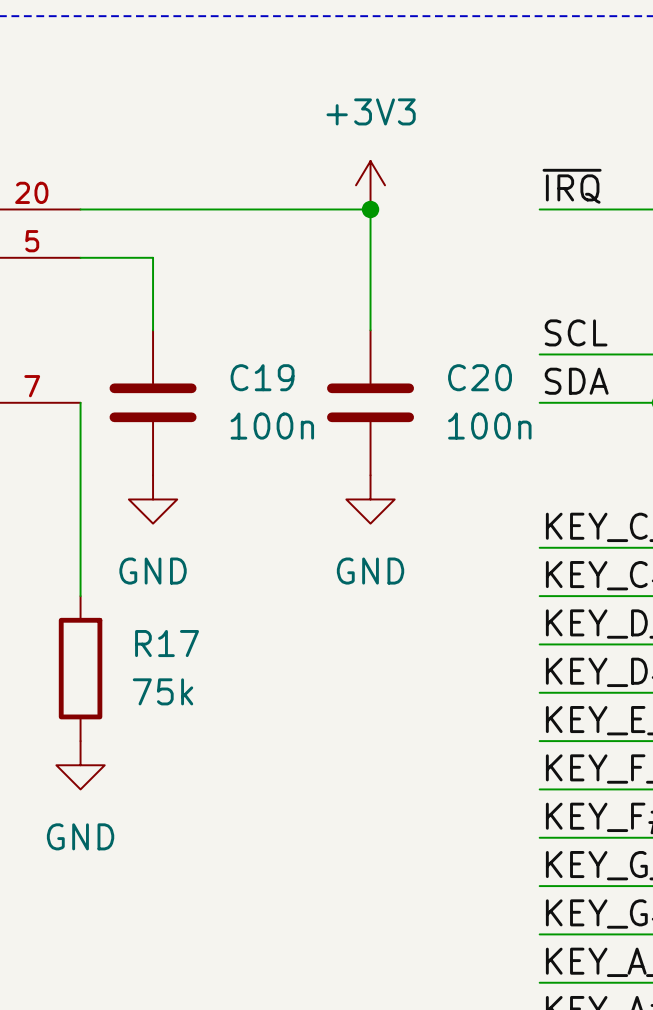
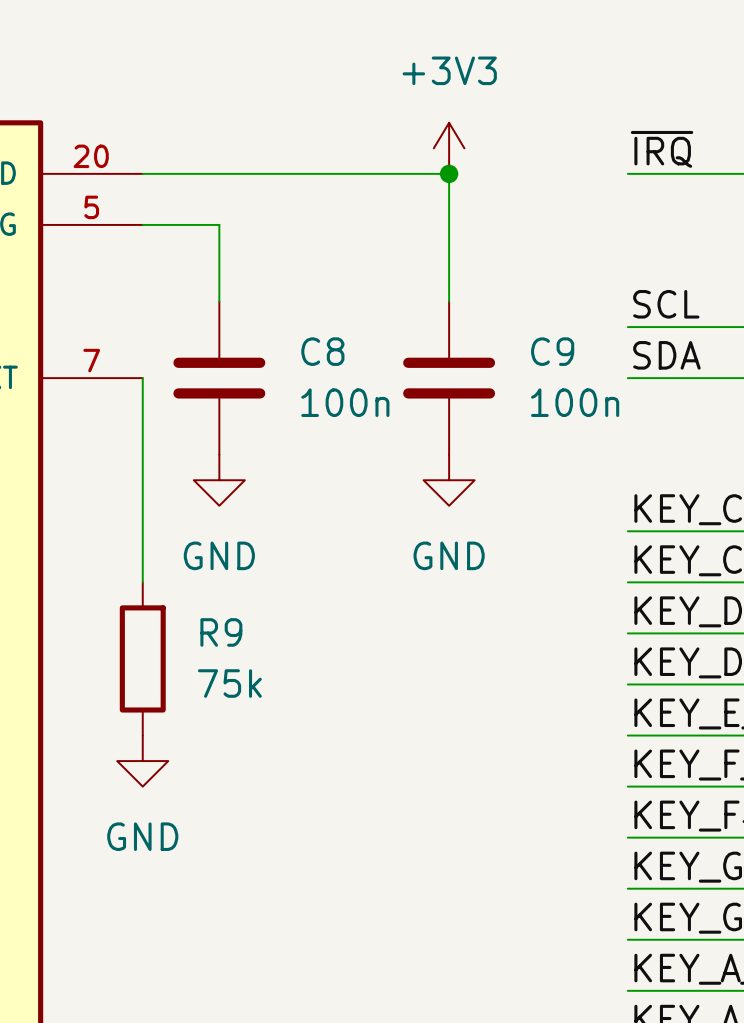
C19 name: C19 (262, 377) -> C8 (322, 351)
C20 name: C20 (480, 377) -> C9 (552, 351)
R17 name: R17 (167, 643) -> R9 (221, 632)

